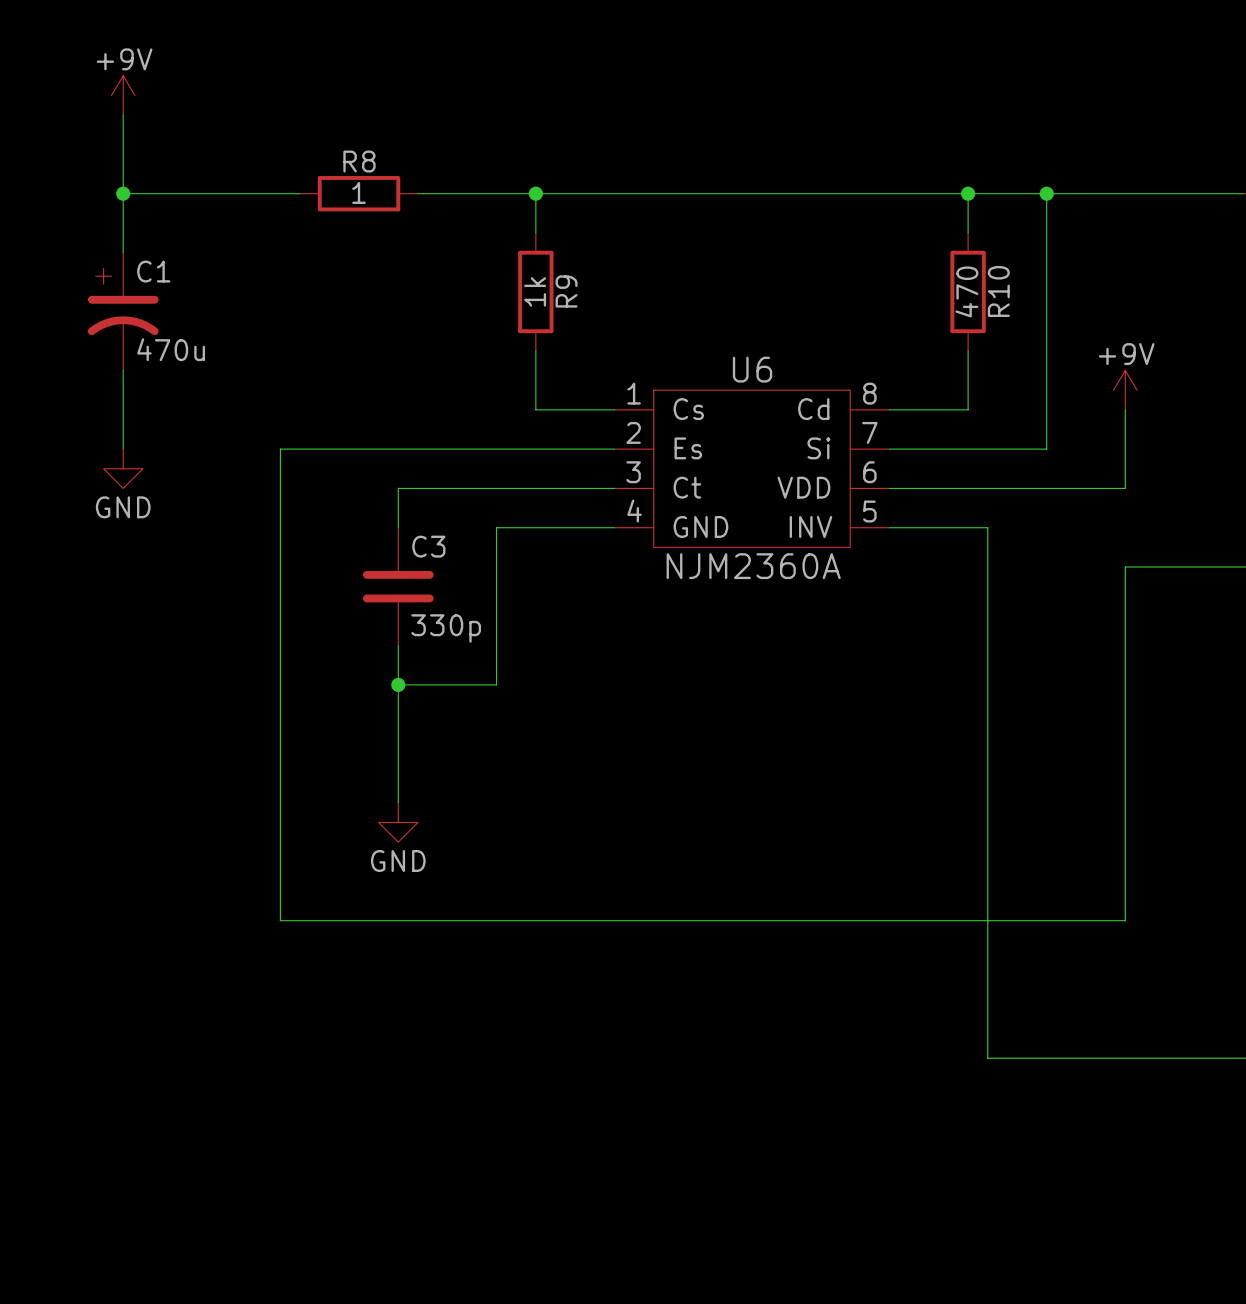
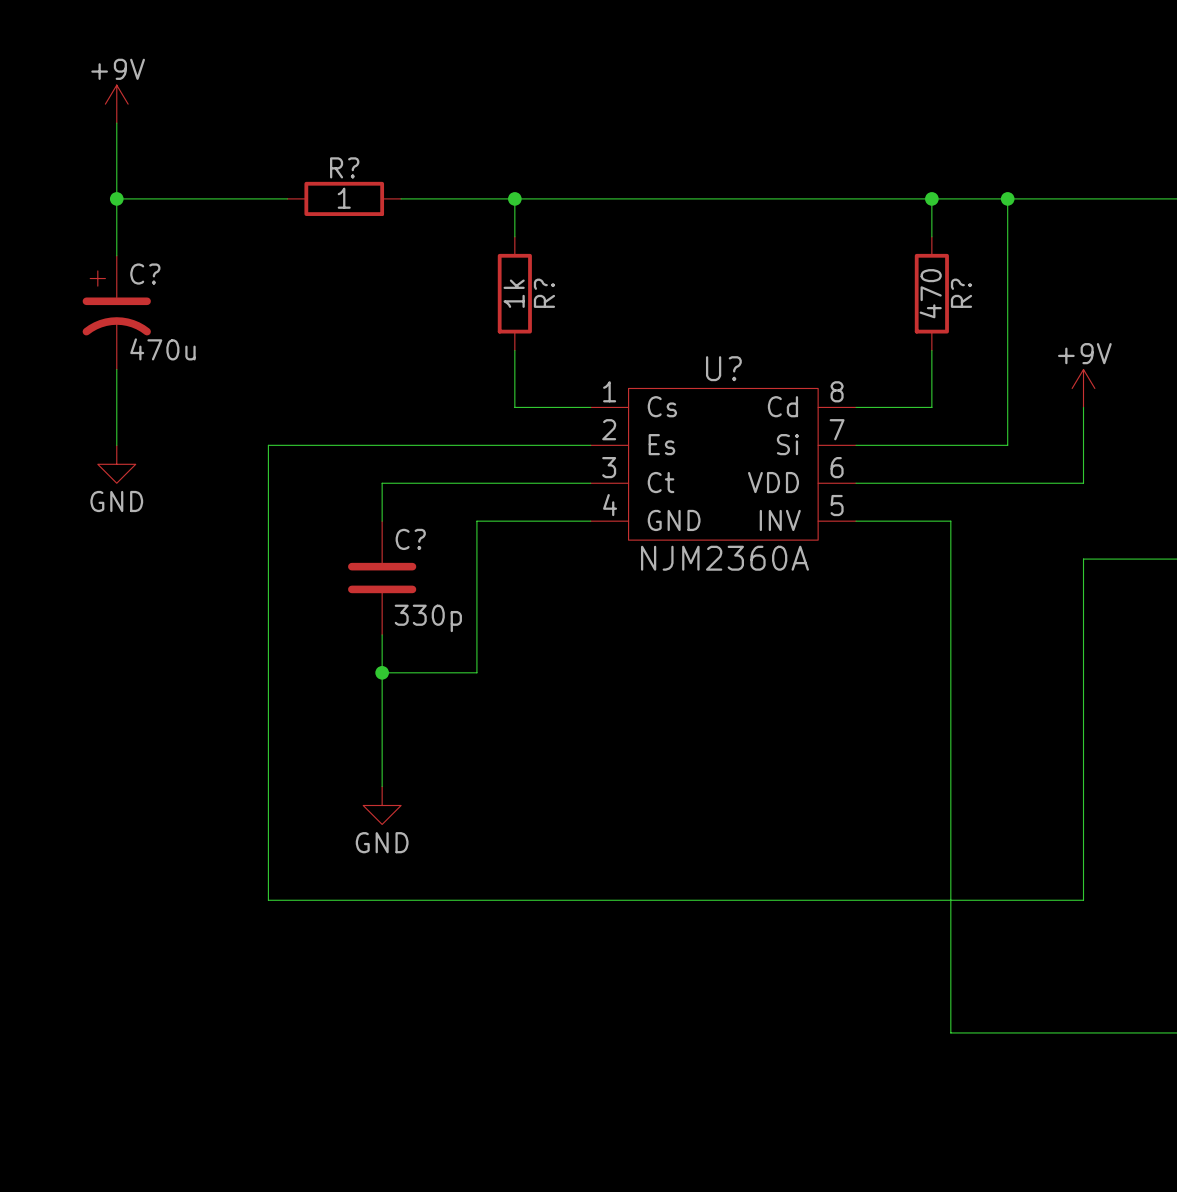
R8 name: R8 (359, 161) -> R? (344, 167)
C1 name: C1 (153, 271) -> C? (145, 274)
R9 name: R9 (566, 291) -> R? (544, 293)
R10 name: R10 (998, 291) -> R? (961, 293)
U6 name: U6 (752, 369) -> U? (723, 368)
C3 name: C3 (428, 546) -> C? (410, 539)

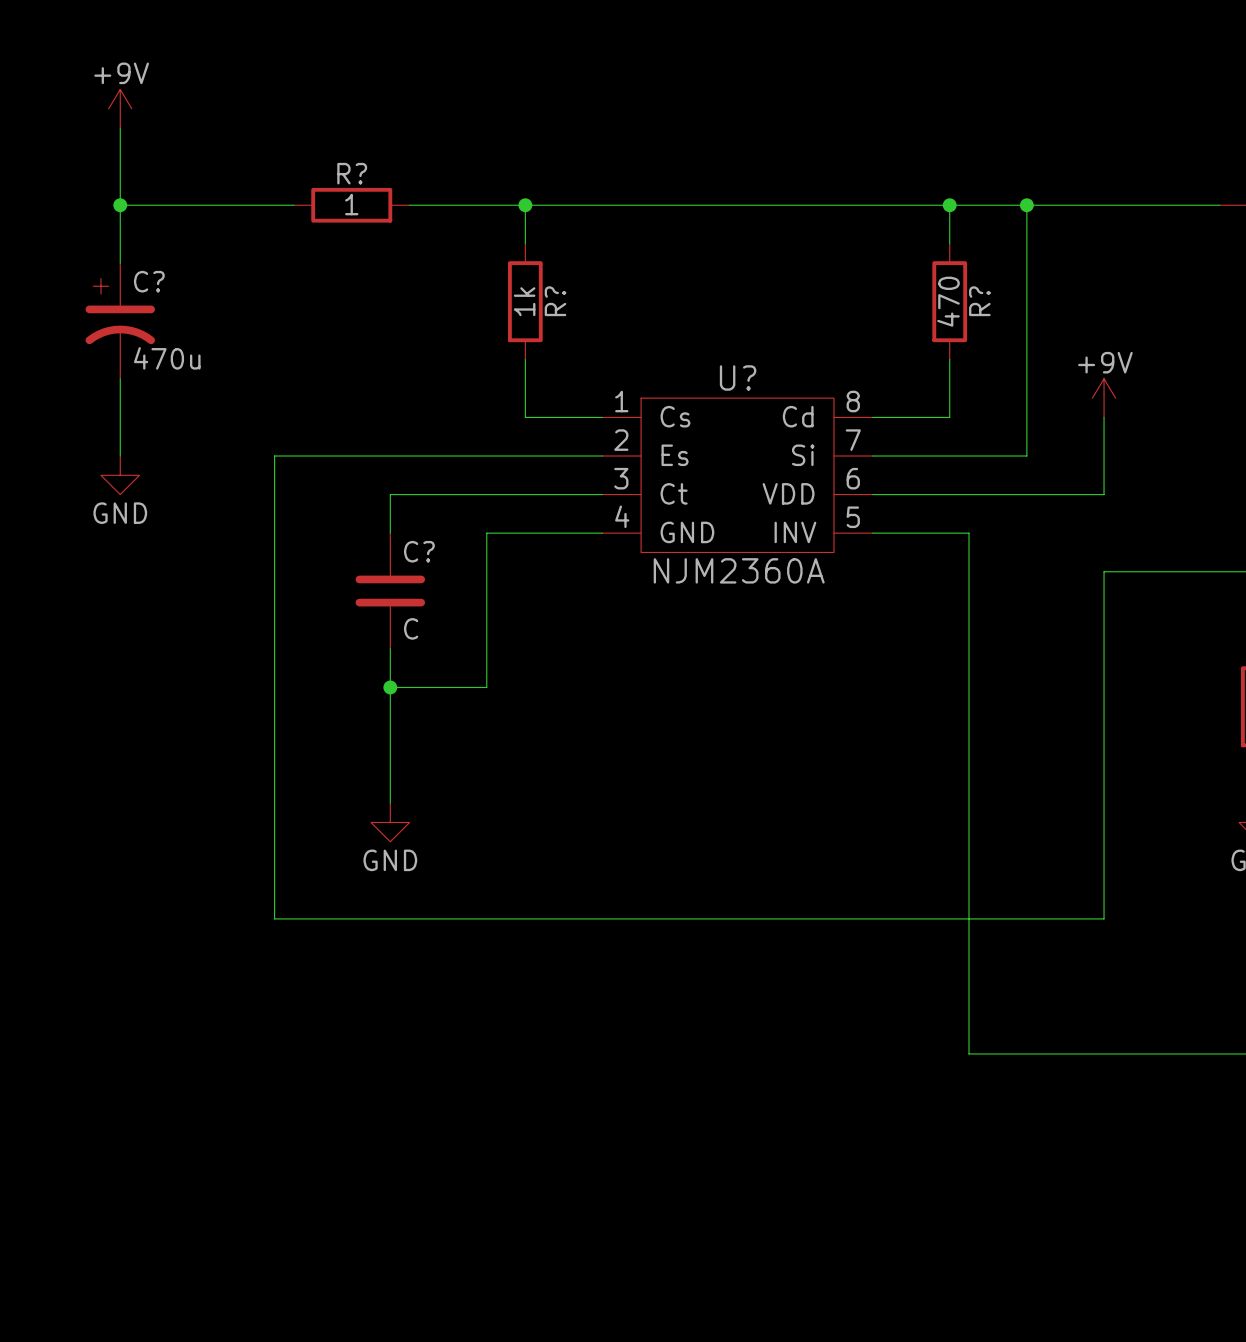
C? value: 330p (428, 618) -> C (411, 628)

